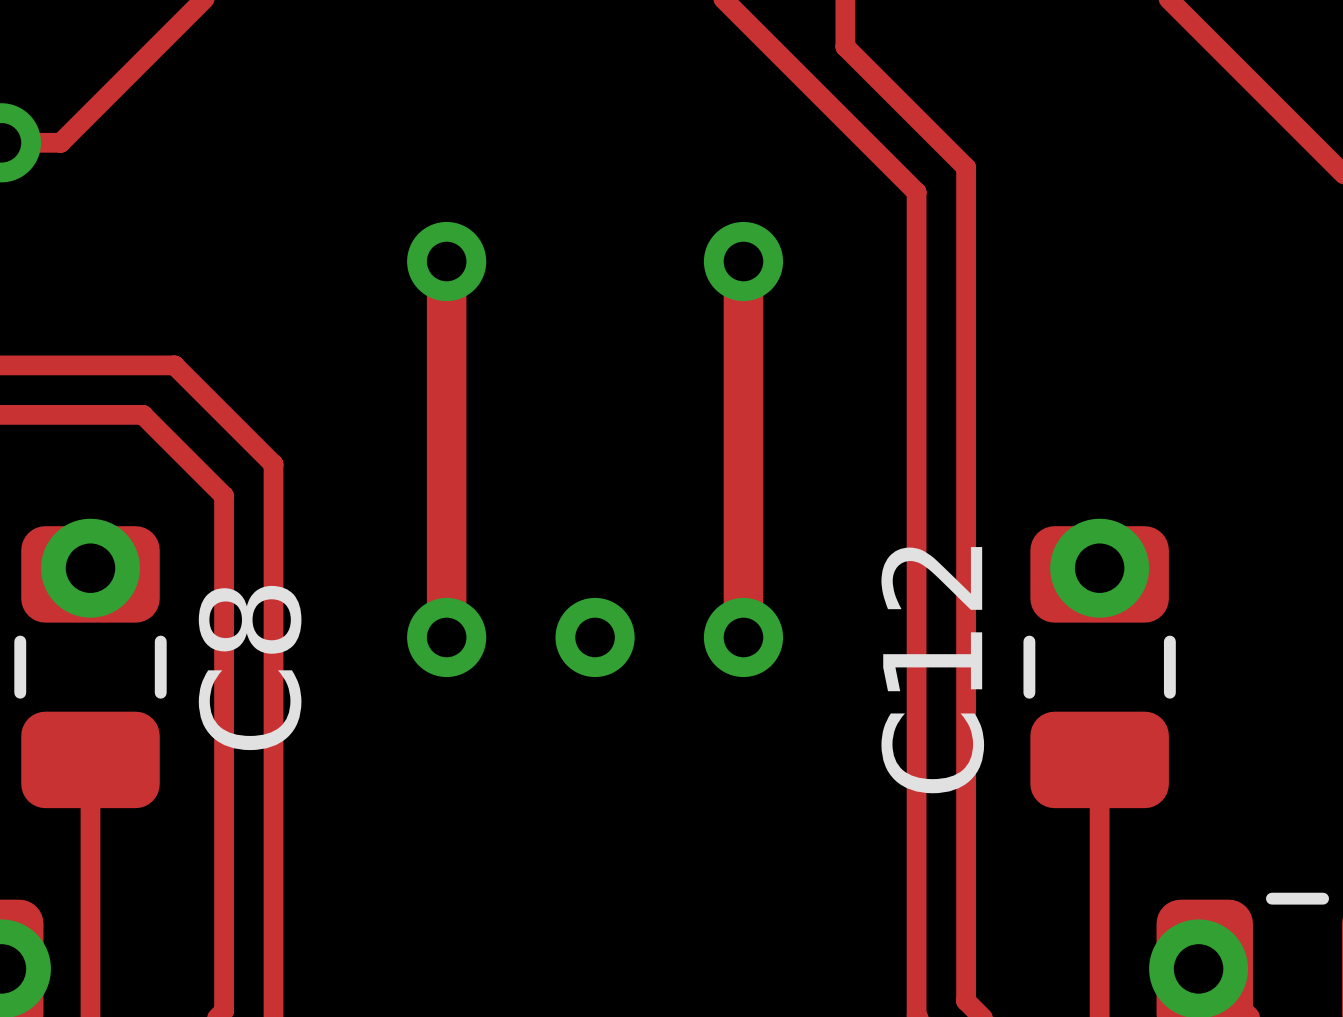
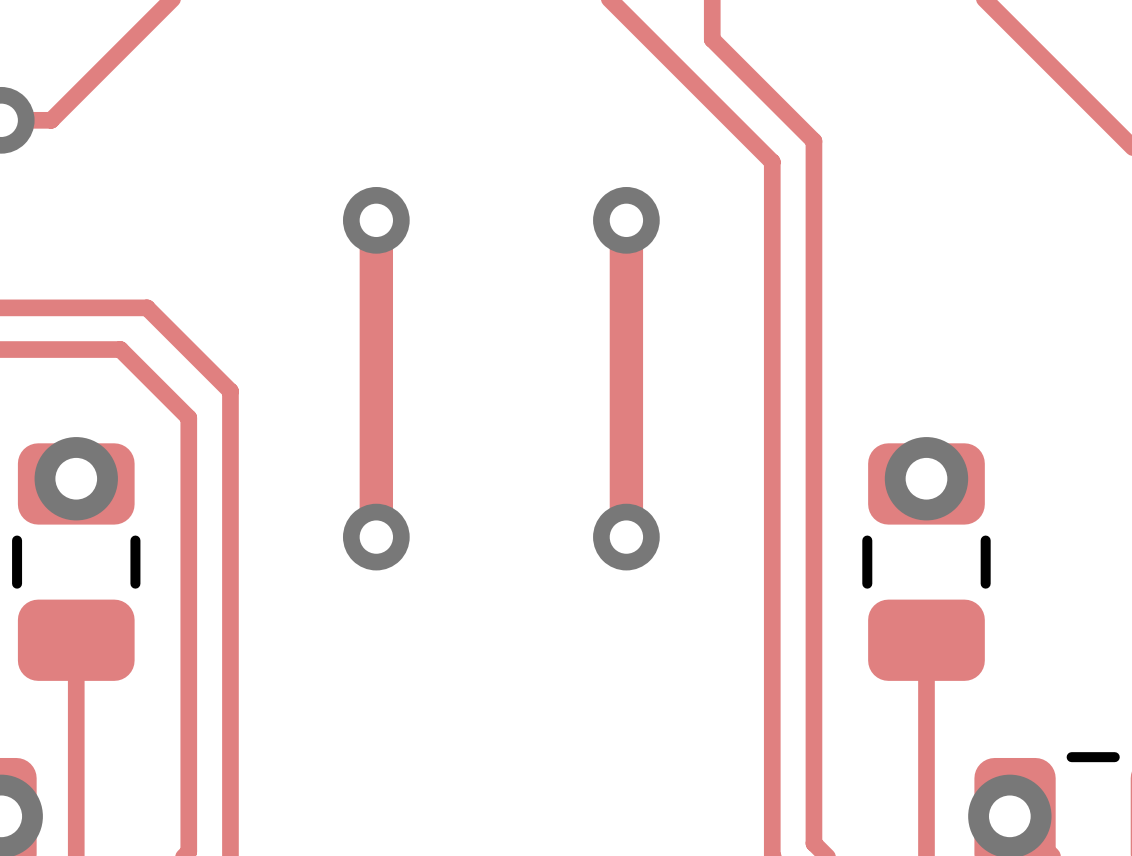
via: (595, 637) -> none
C8 name: C8 (250, 667) -> none
C12 name: C12 (932, 670) -> none

